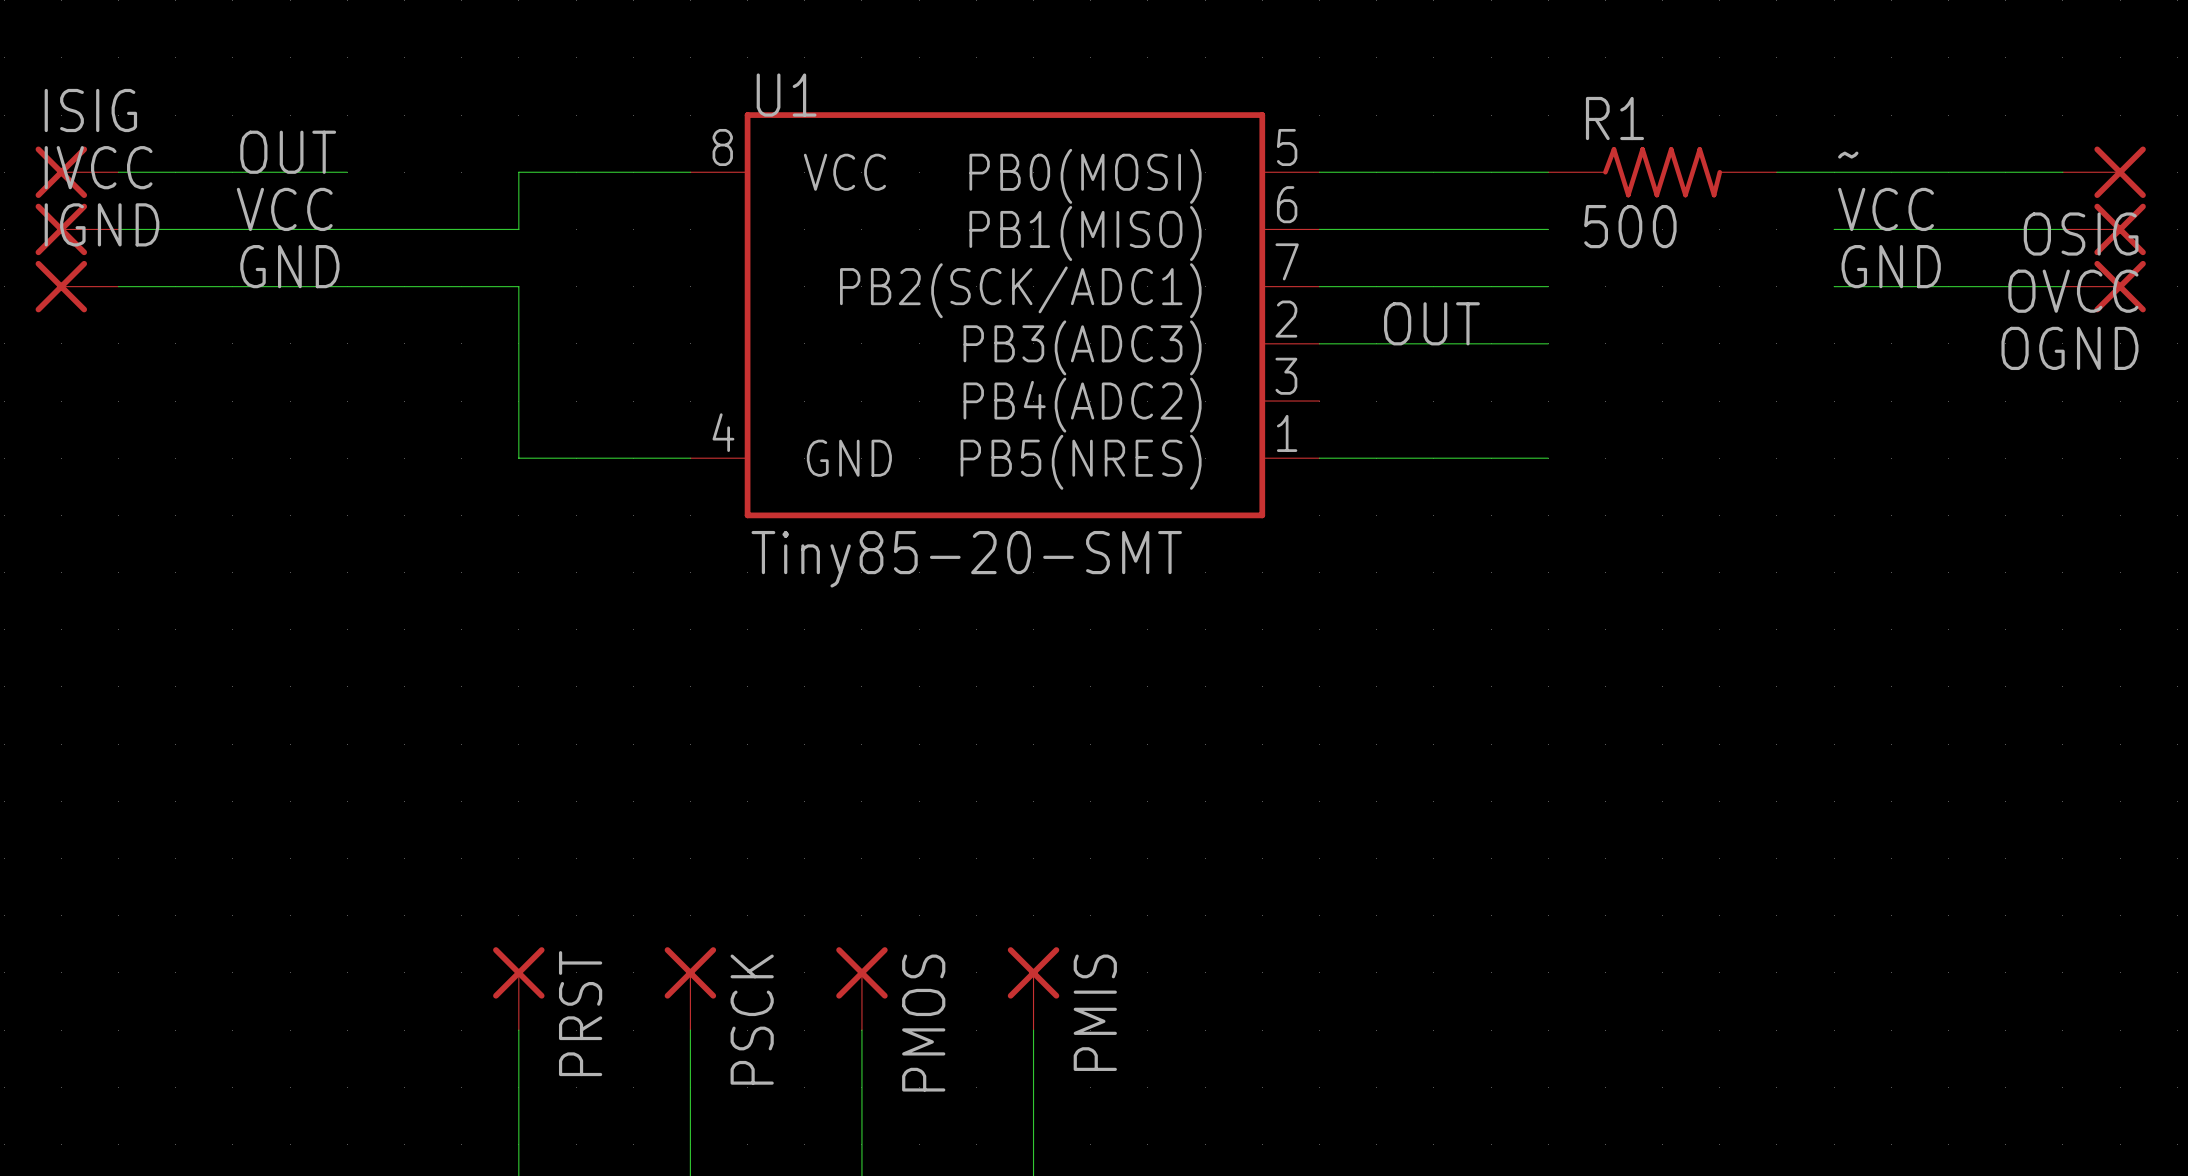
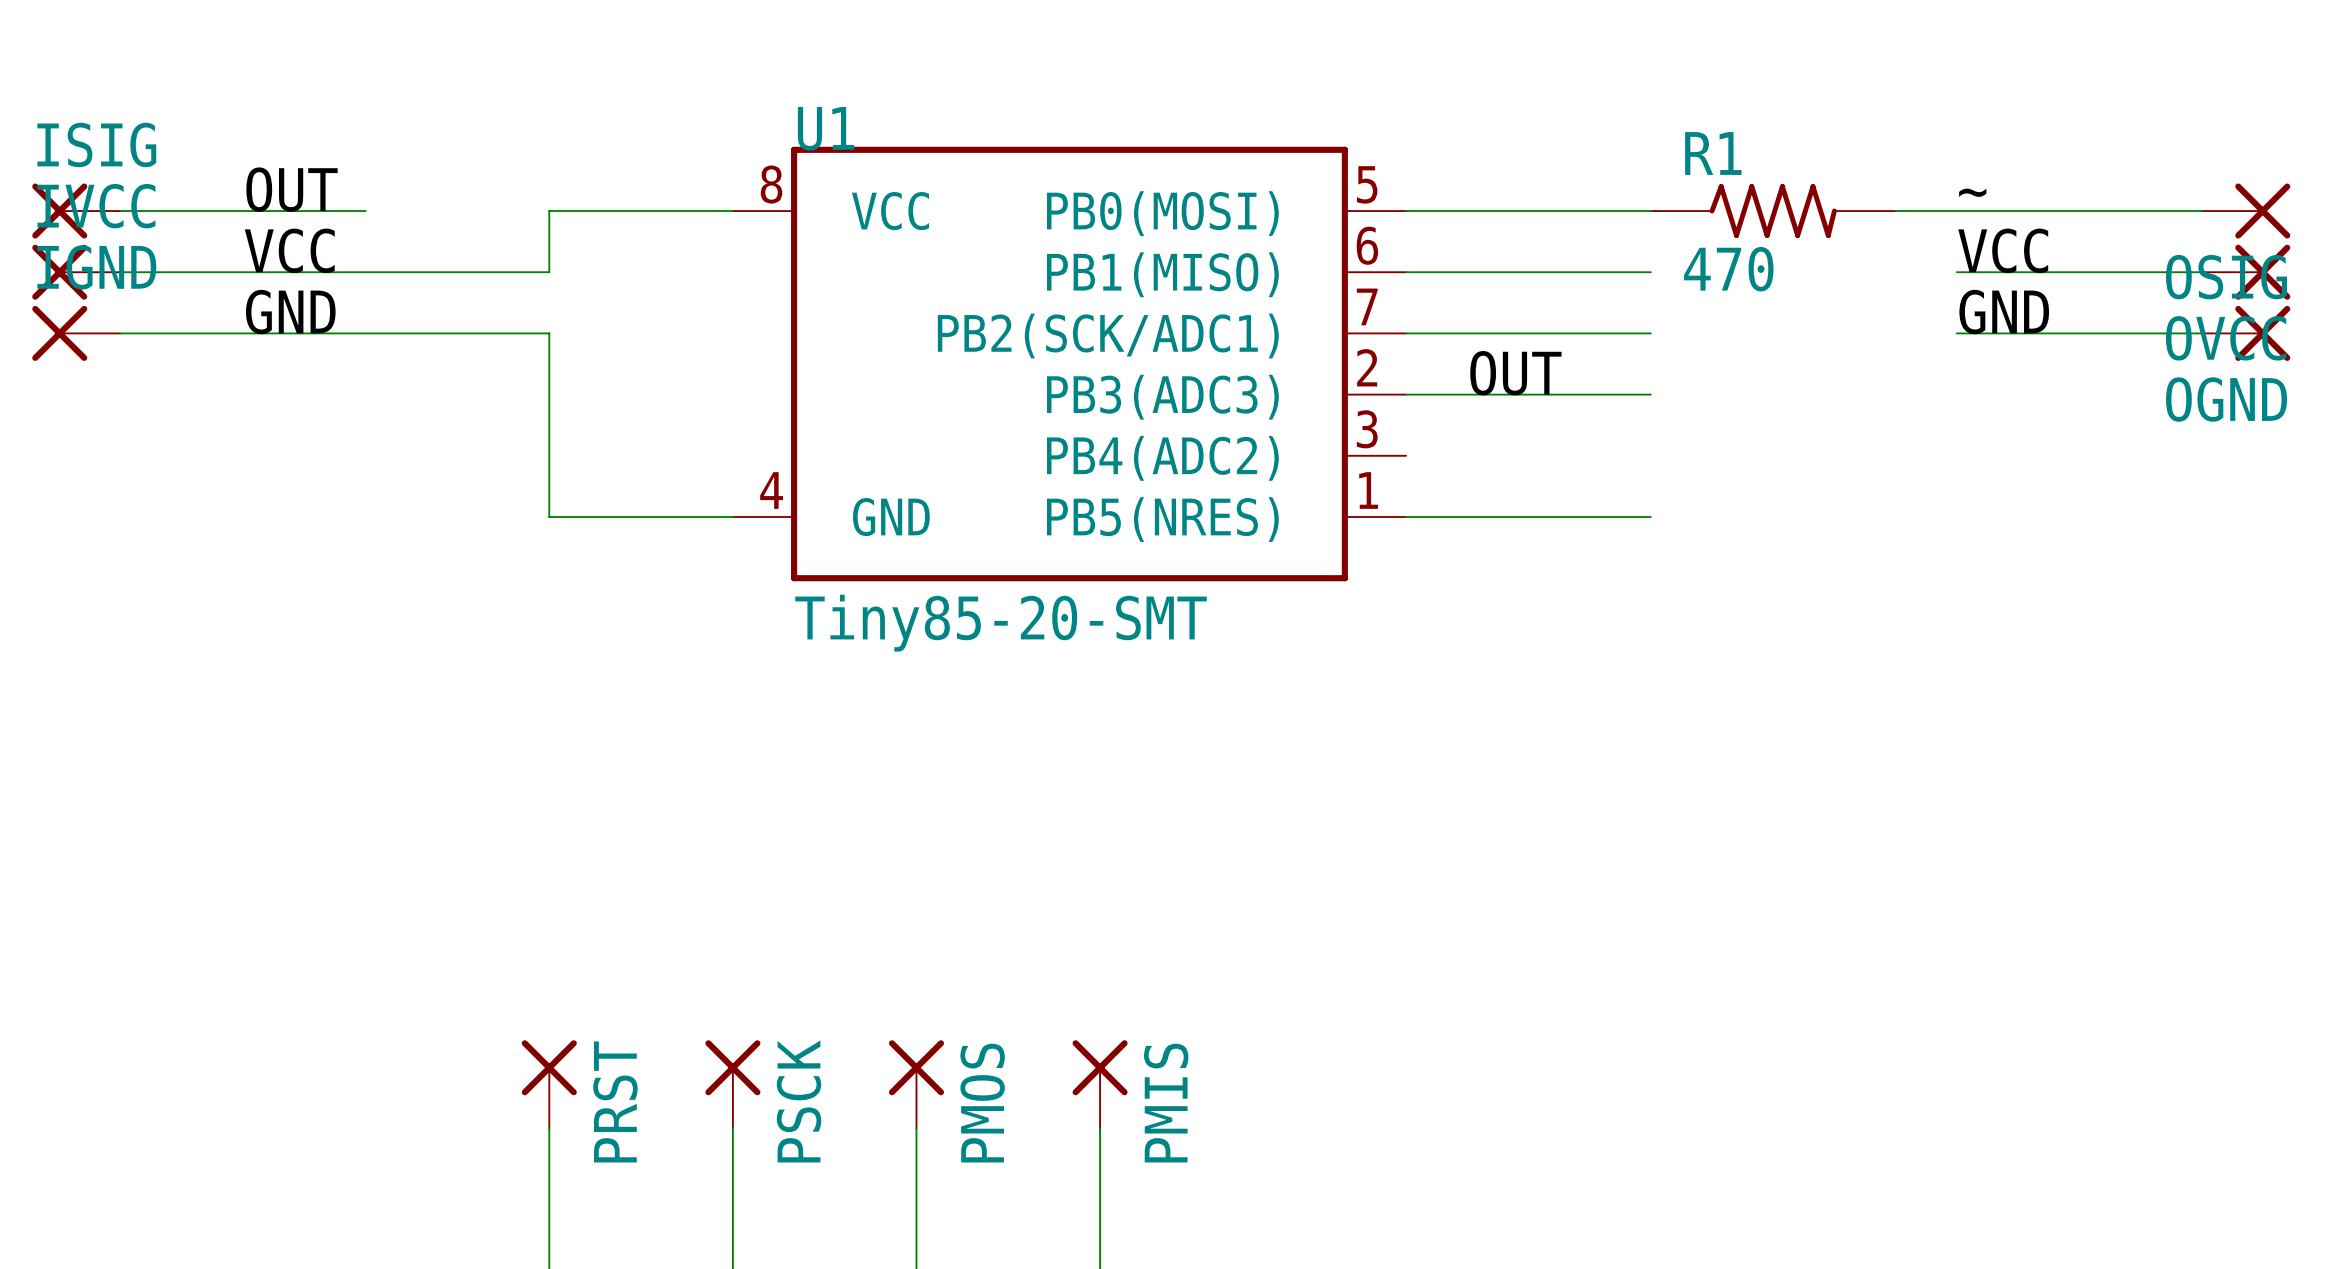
R1 value: 500 (1630, 226) -> 470 (1728, 269)

